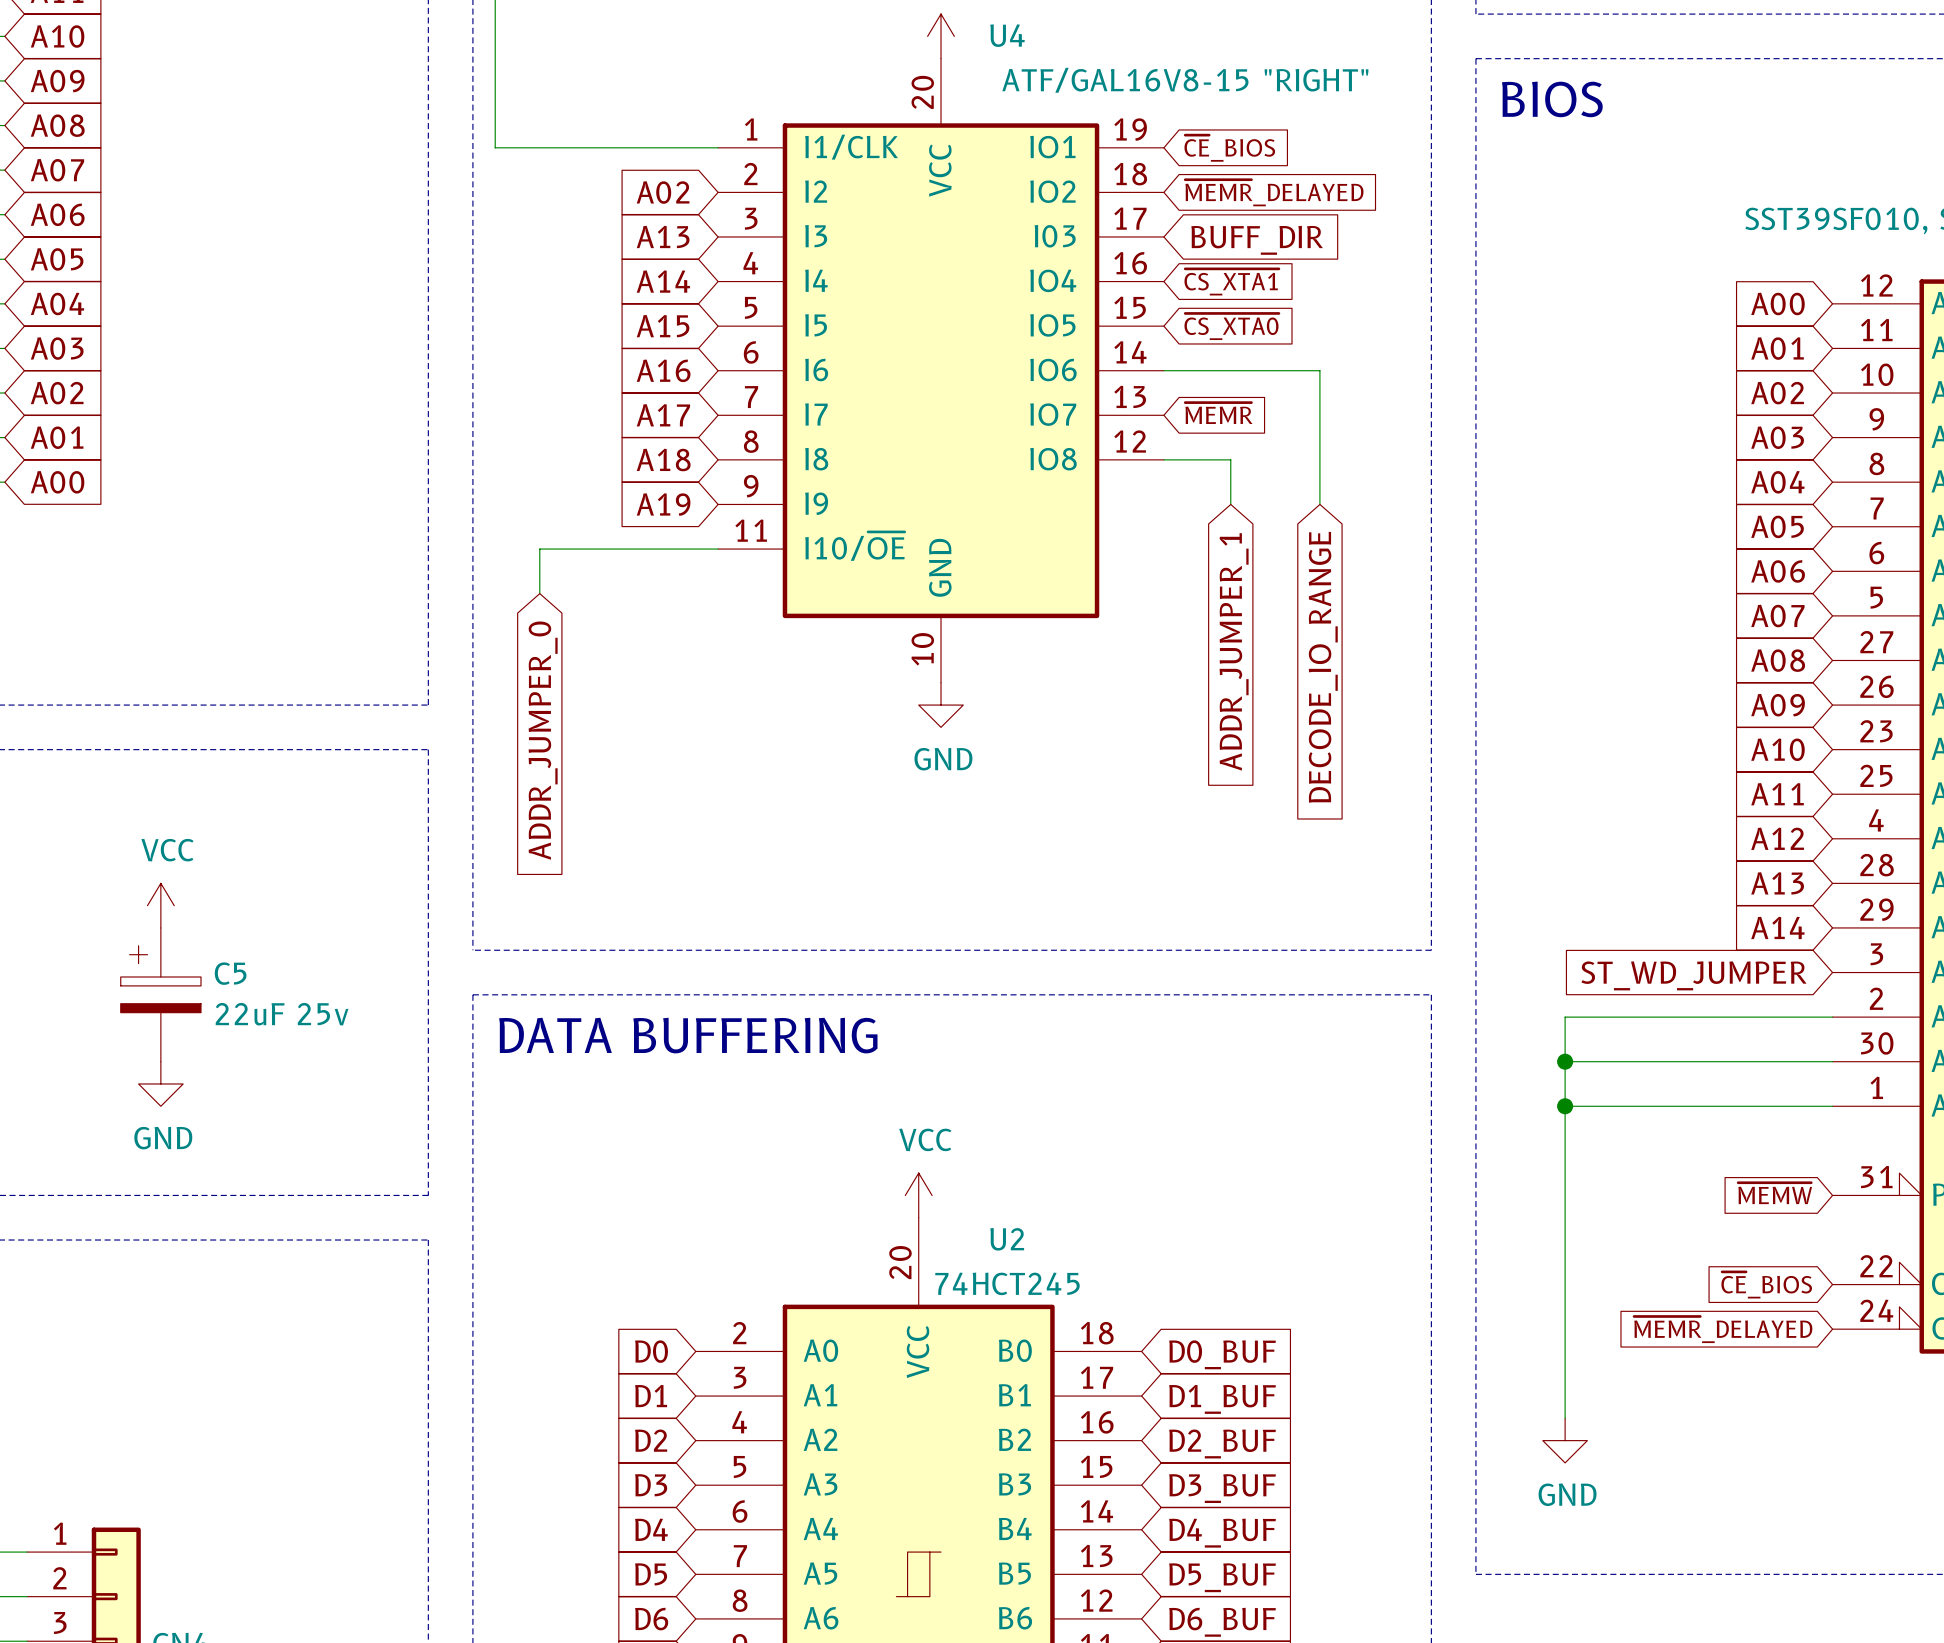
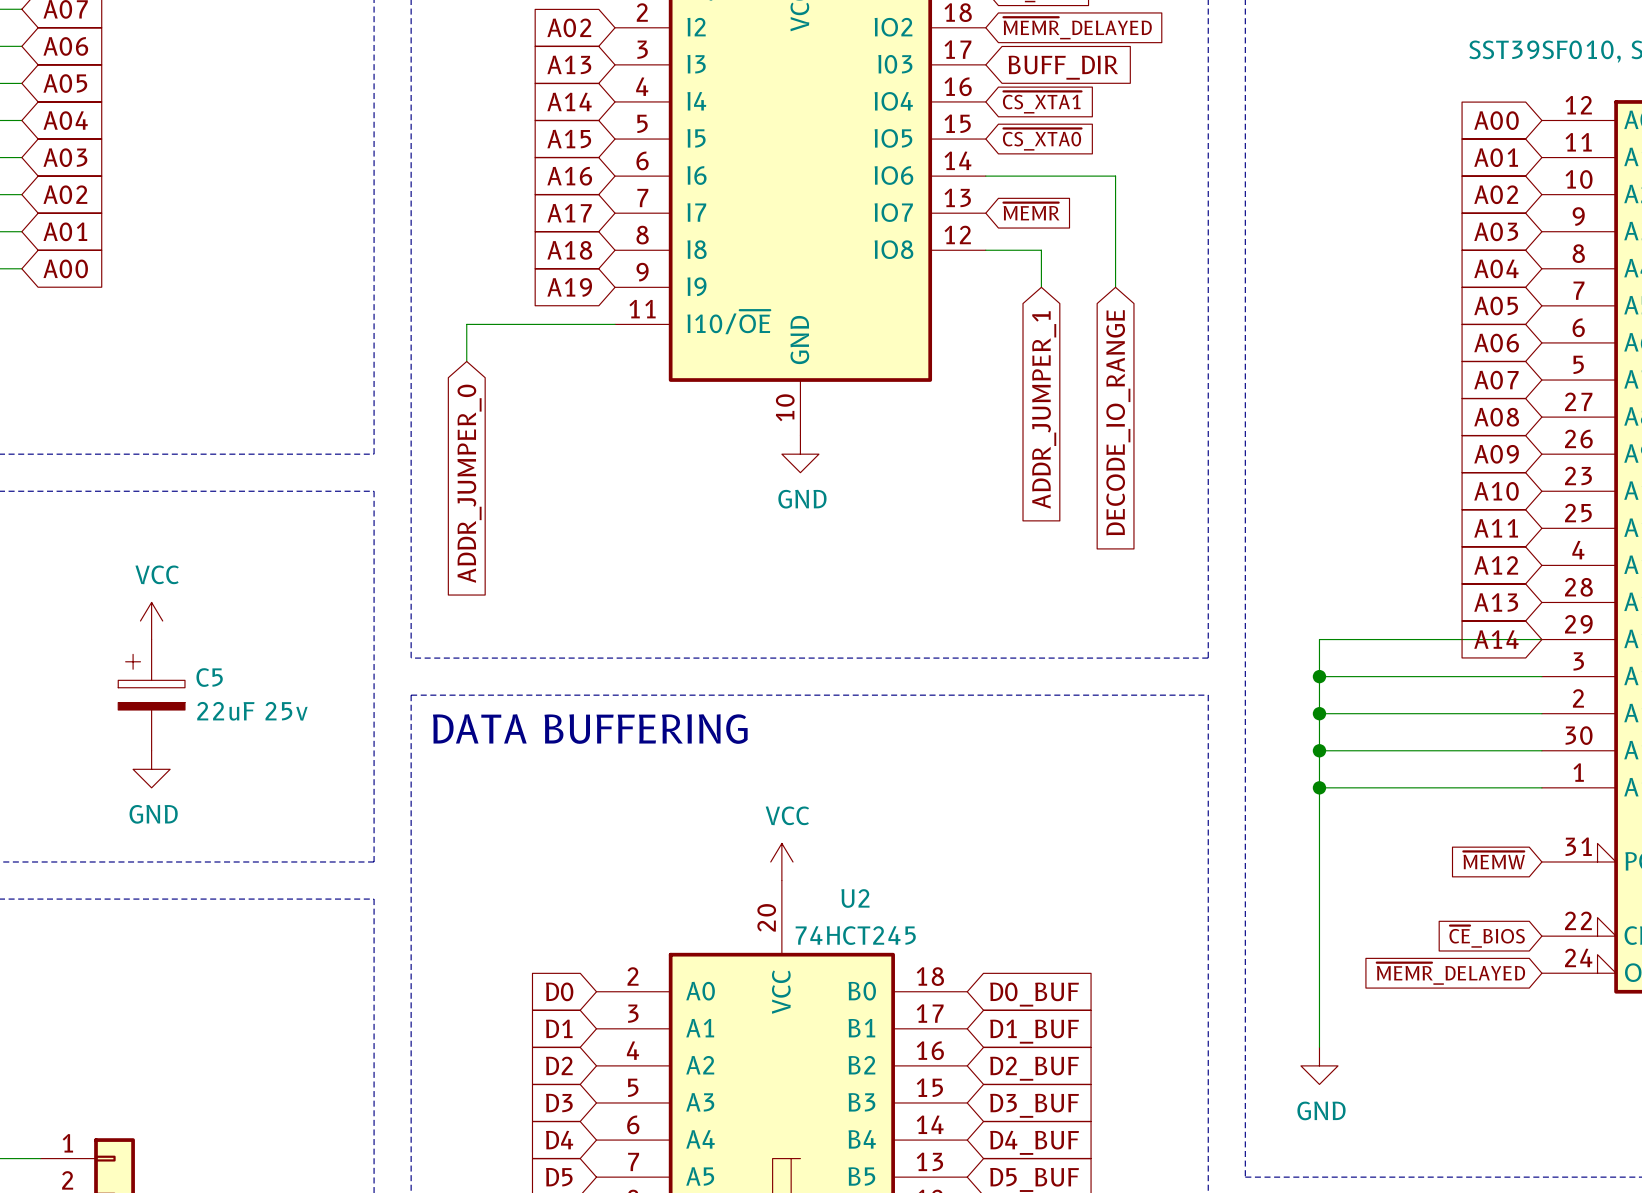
wire: none -> (1541, 639) (1319, 639) (1319, 713)
wire: none -> (1319, 676) (1541, 676)
junction: none -> (1319, 676)
global label: ST_WD_JUMPER (1693, 975) -> none
junction: none -> (1319, 713)

